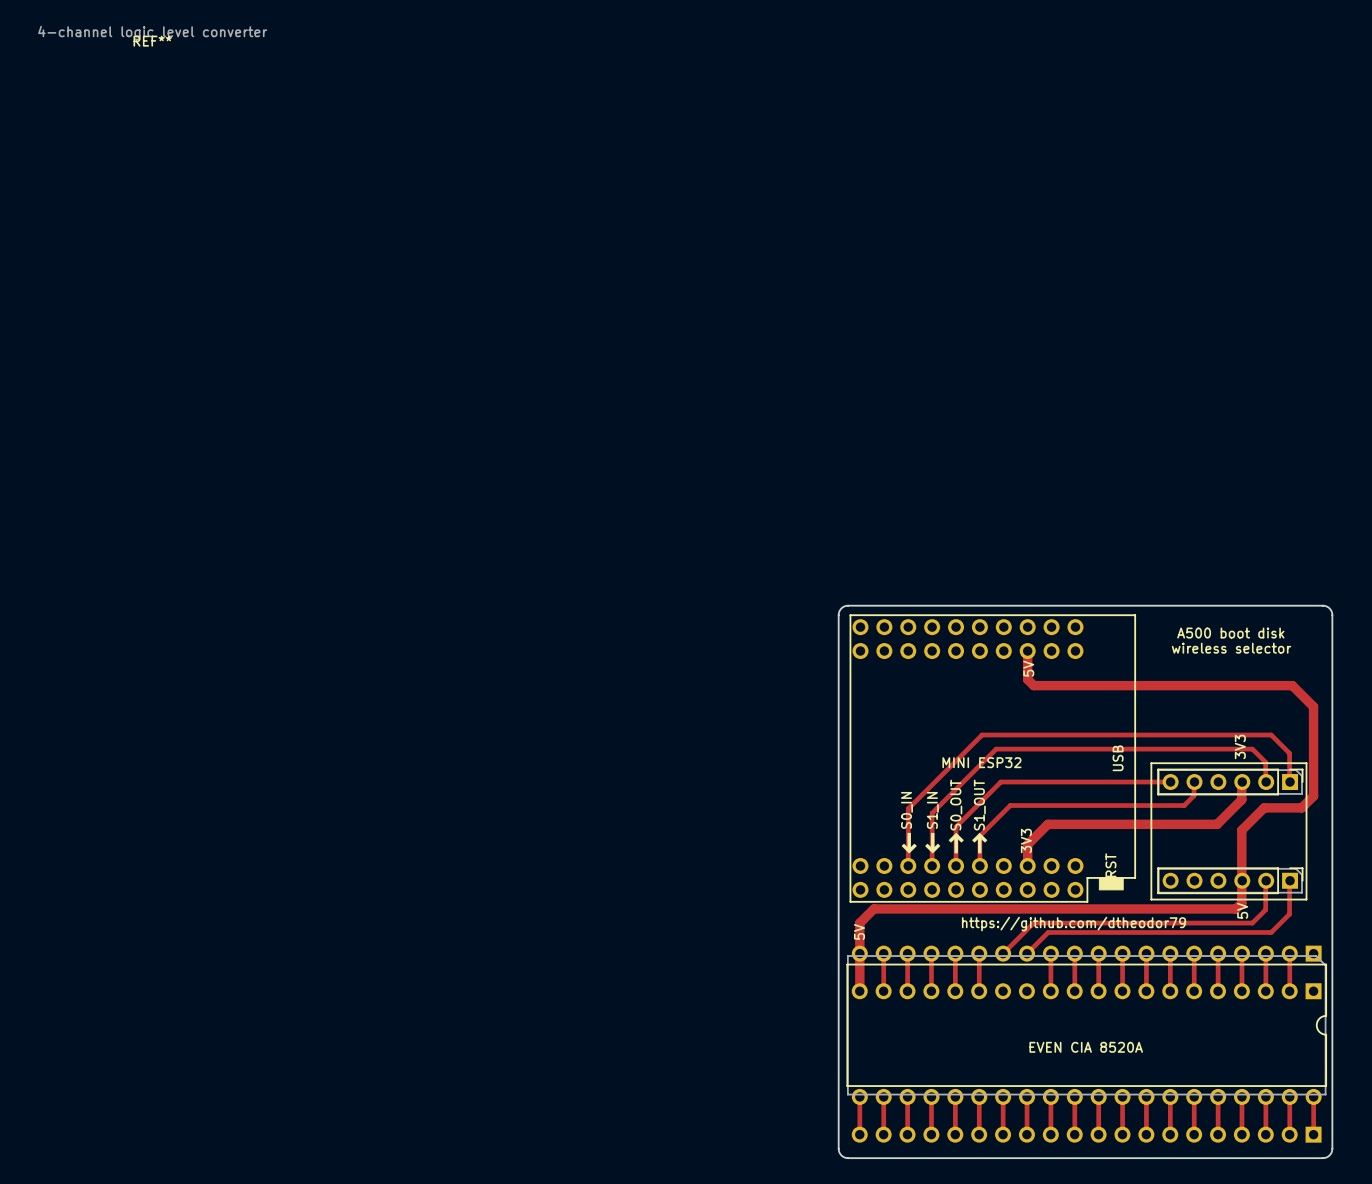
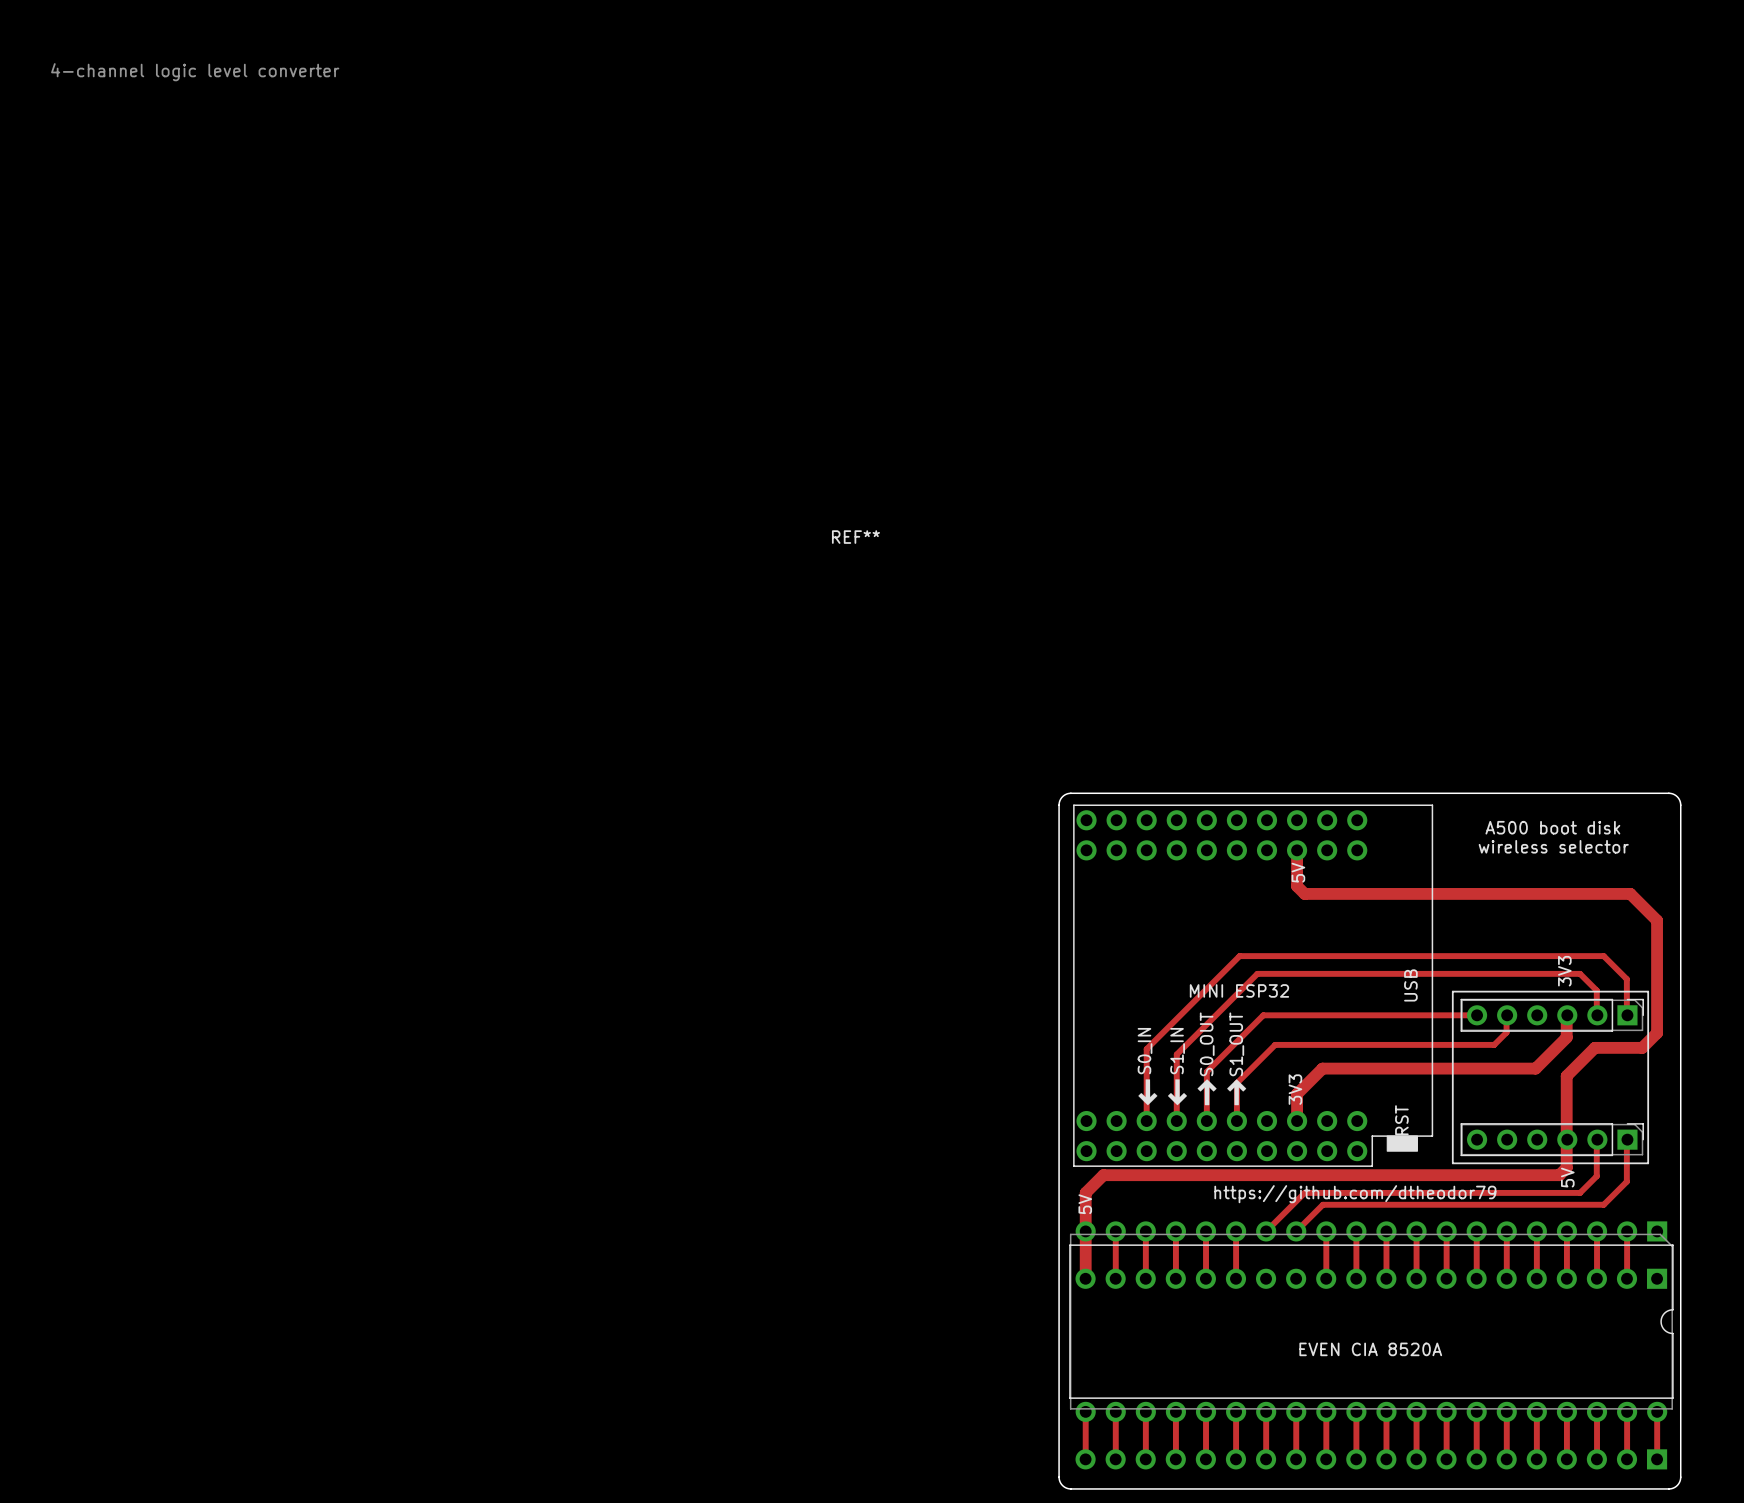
REF**: 4-channel logic level converter (152, 36) -> none
REF**: none -> 4-channel logic level converter (465, 303)

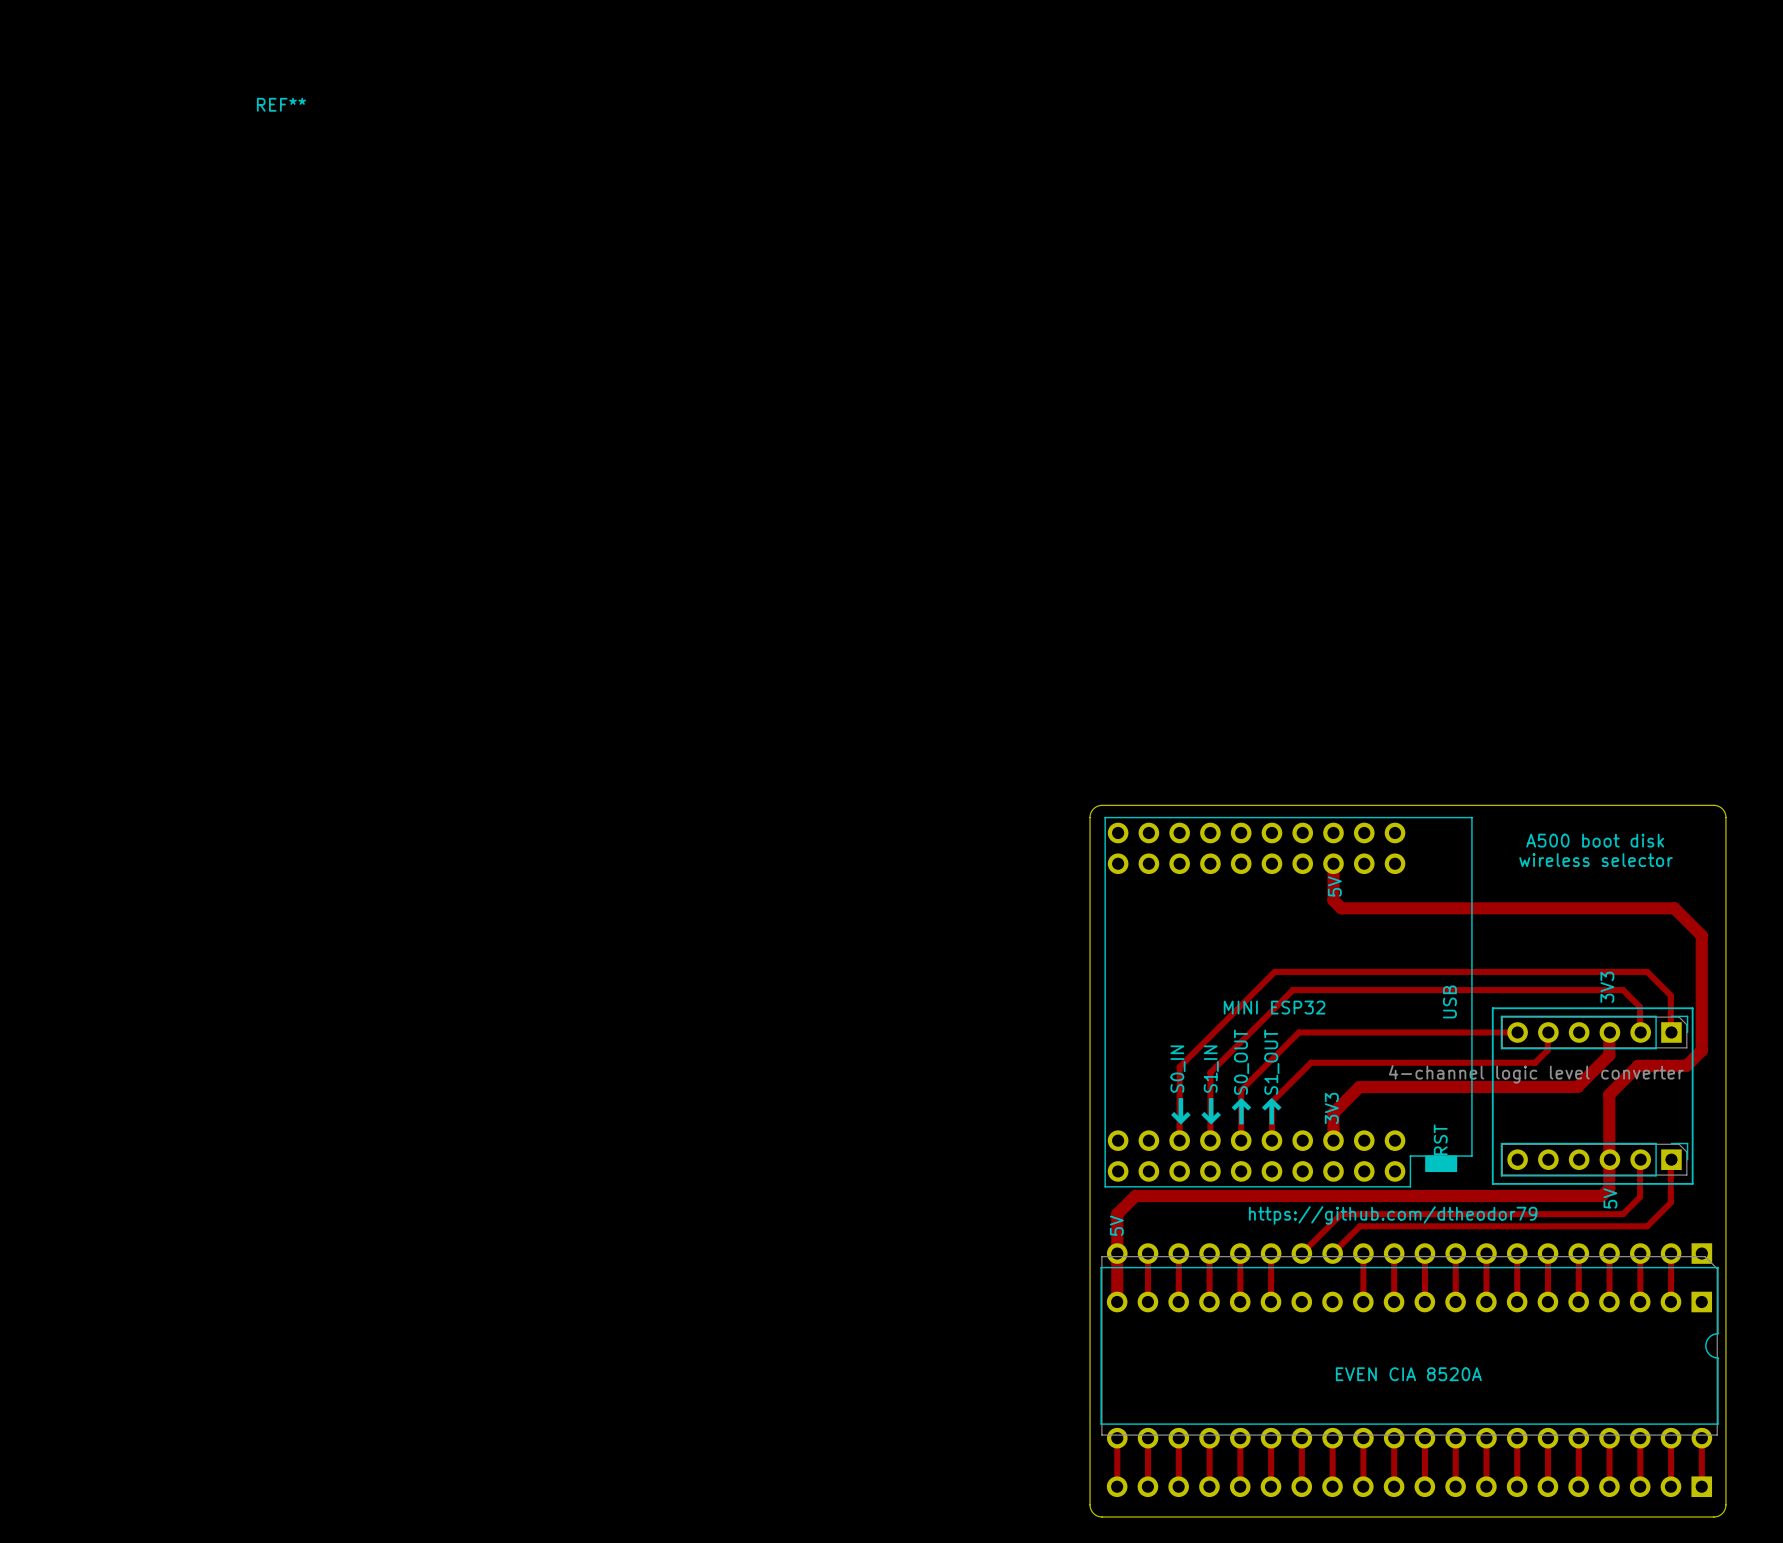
REF**: 4-channel logic level converter (465, 303) -> none
REF**: none -> 4-channel logic level converter (970, 590)

